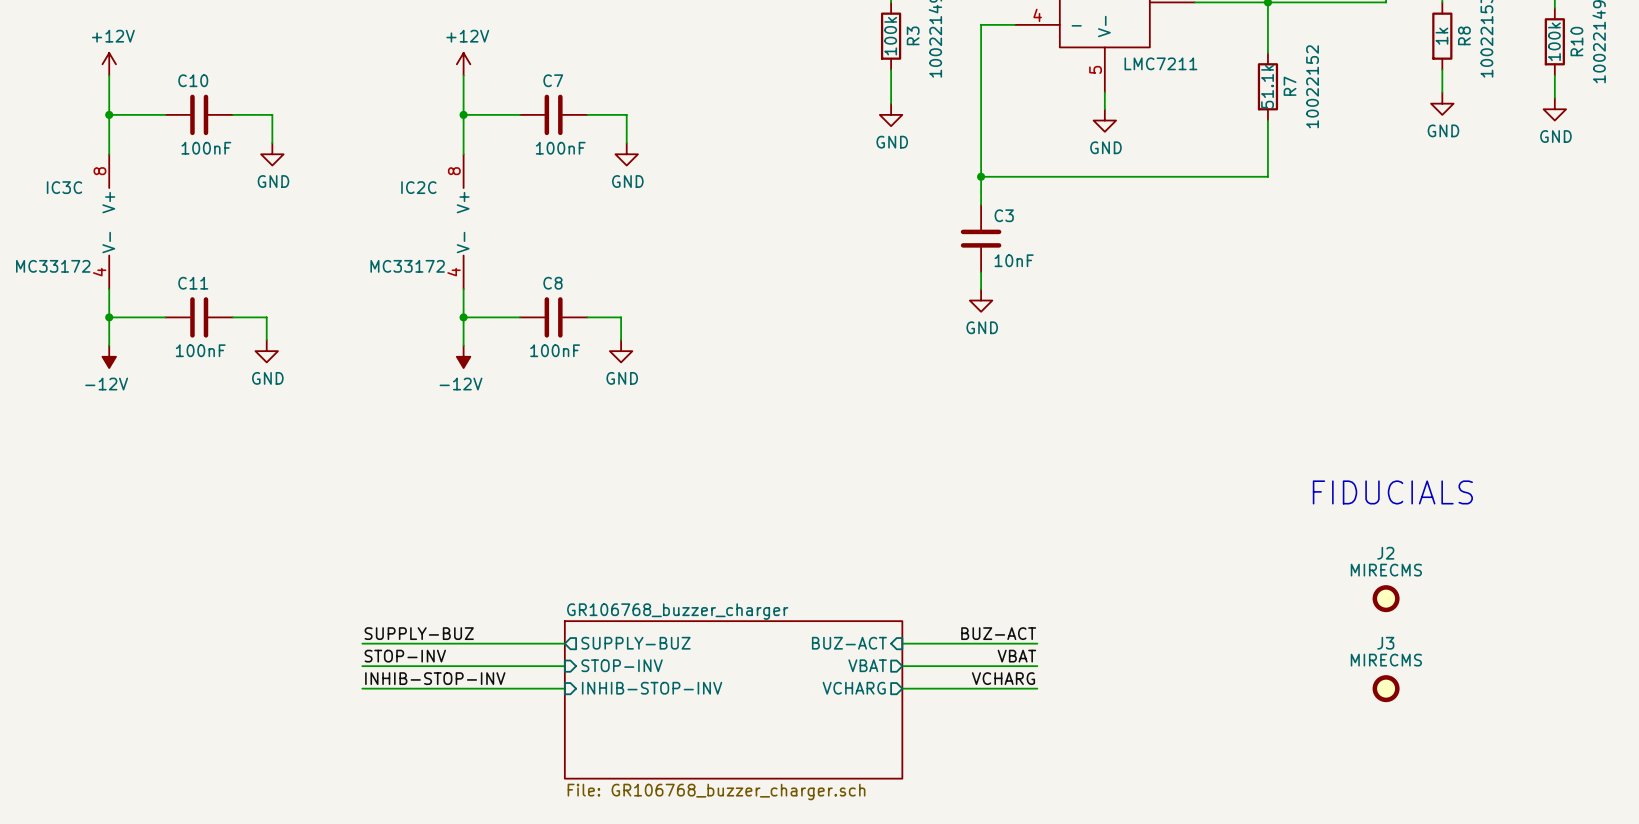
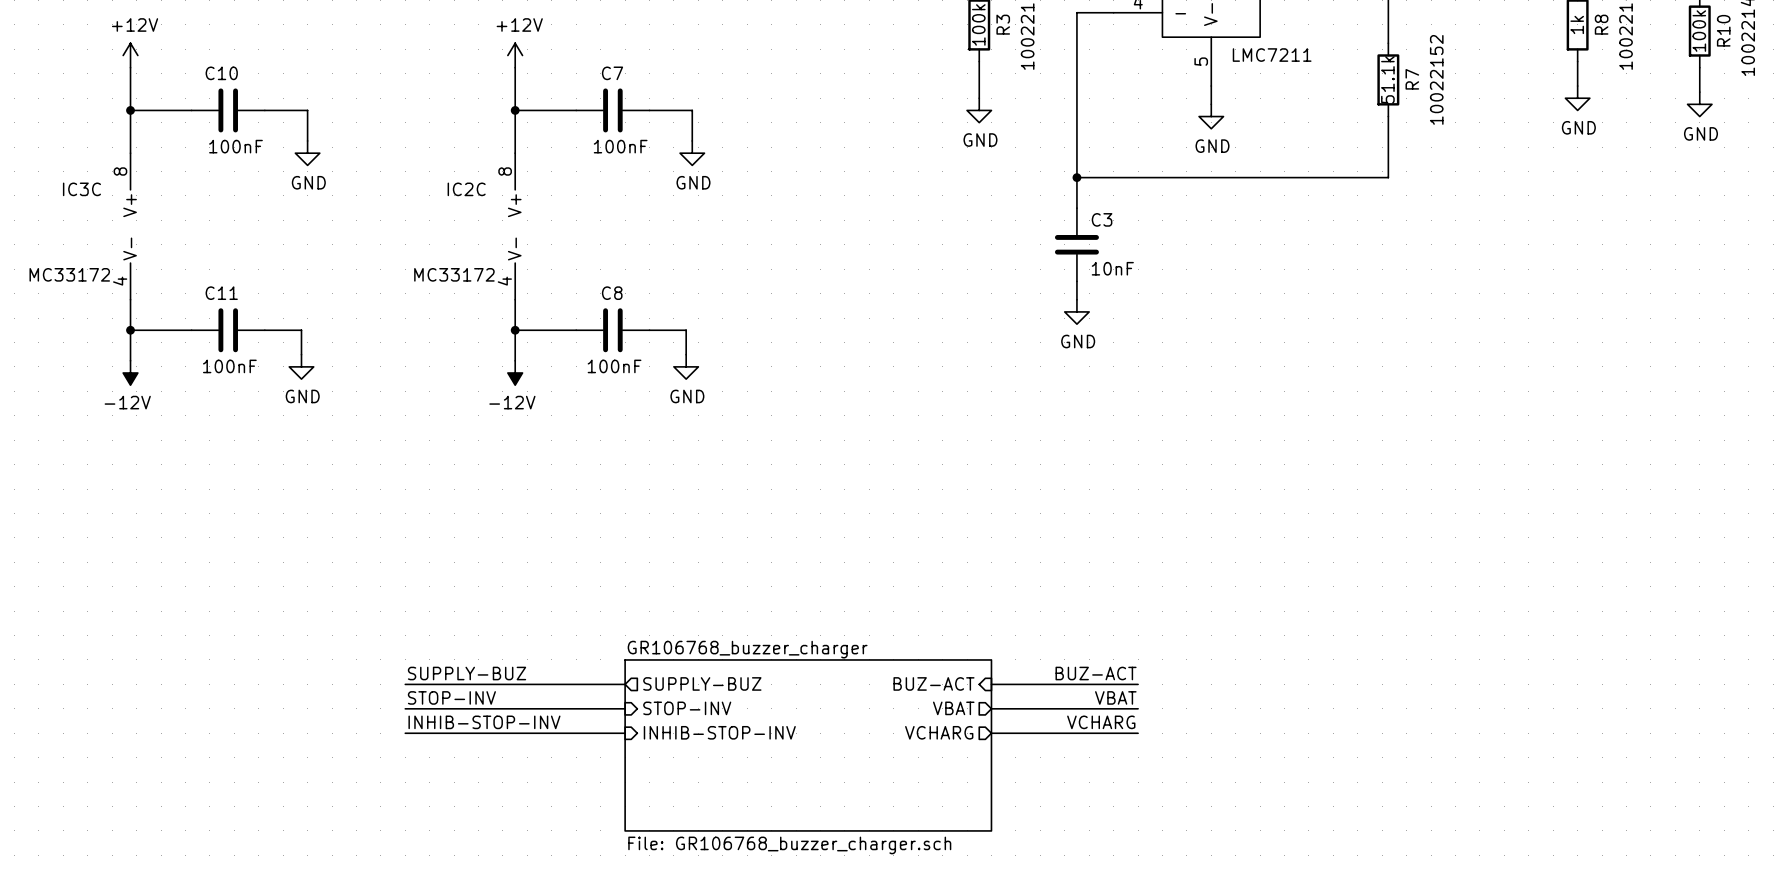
text: FIDUCIALS (1392, 492) -> none
J2: MIRECMS (1386, 598) -> none
J3: MIRECMS (1386, 688) -> none

